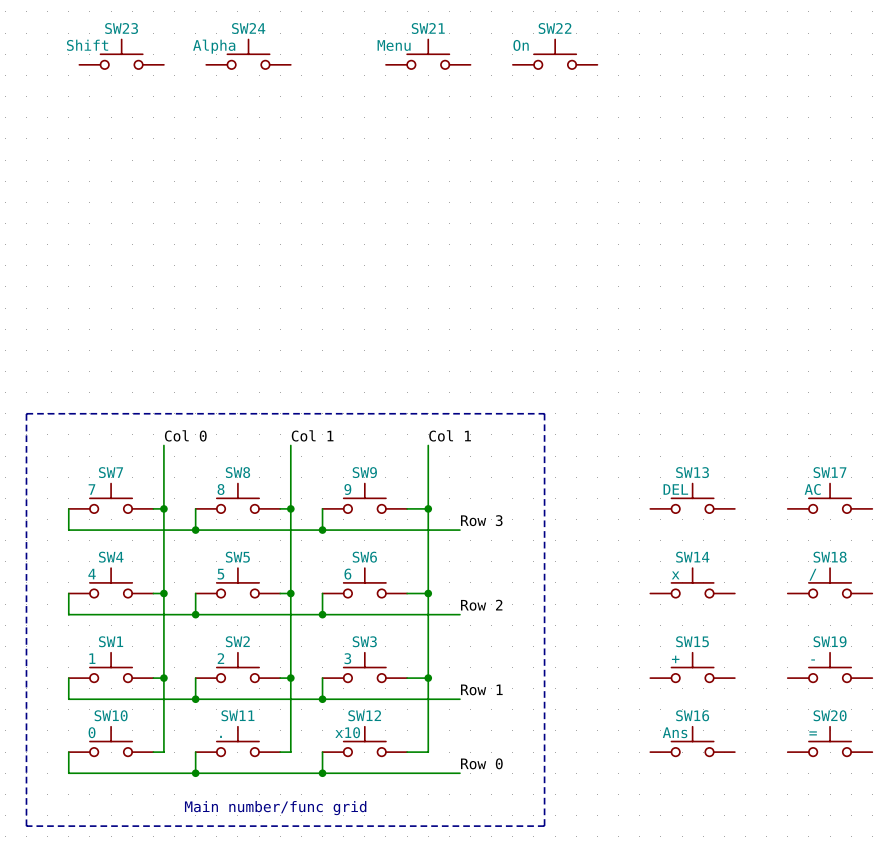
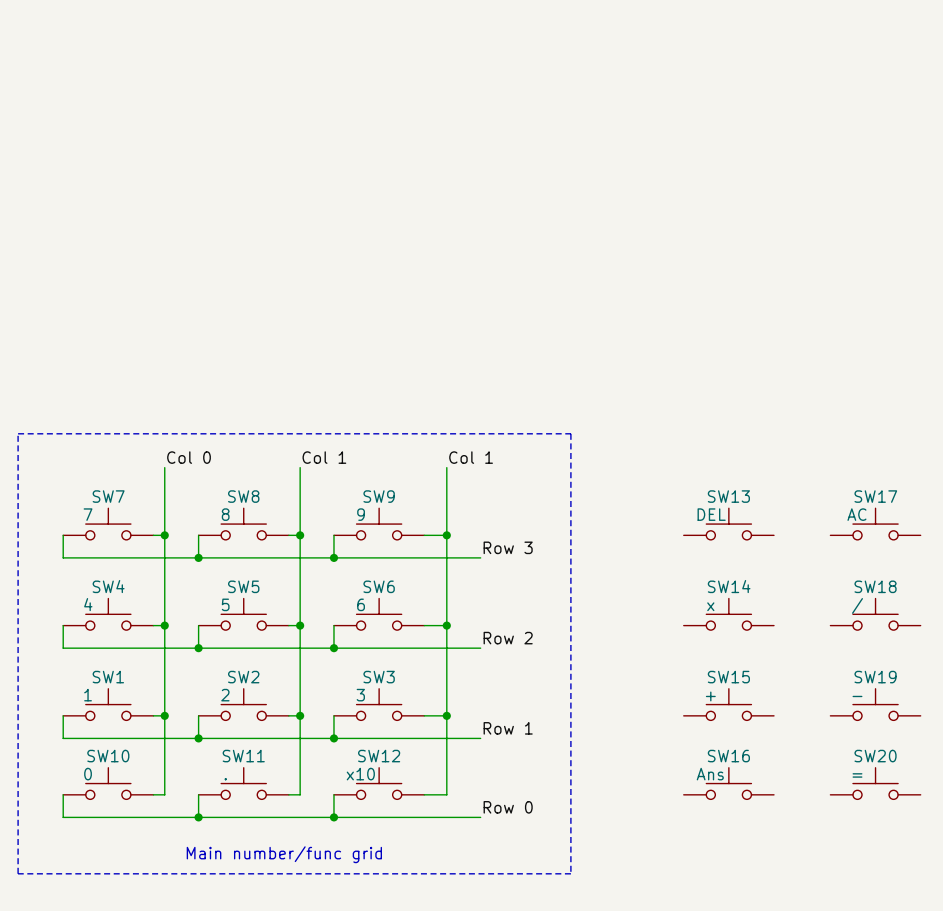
SW23: Shift (121, 54) -> none
SW24: Alpha (248, 54) -> none
SW21: Menu (428, 54) -> none
SW22: On (555, 54) -> none

